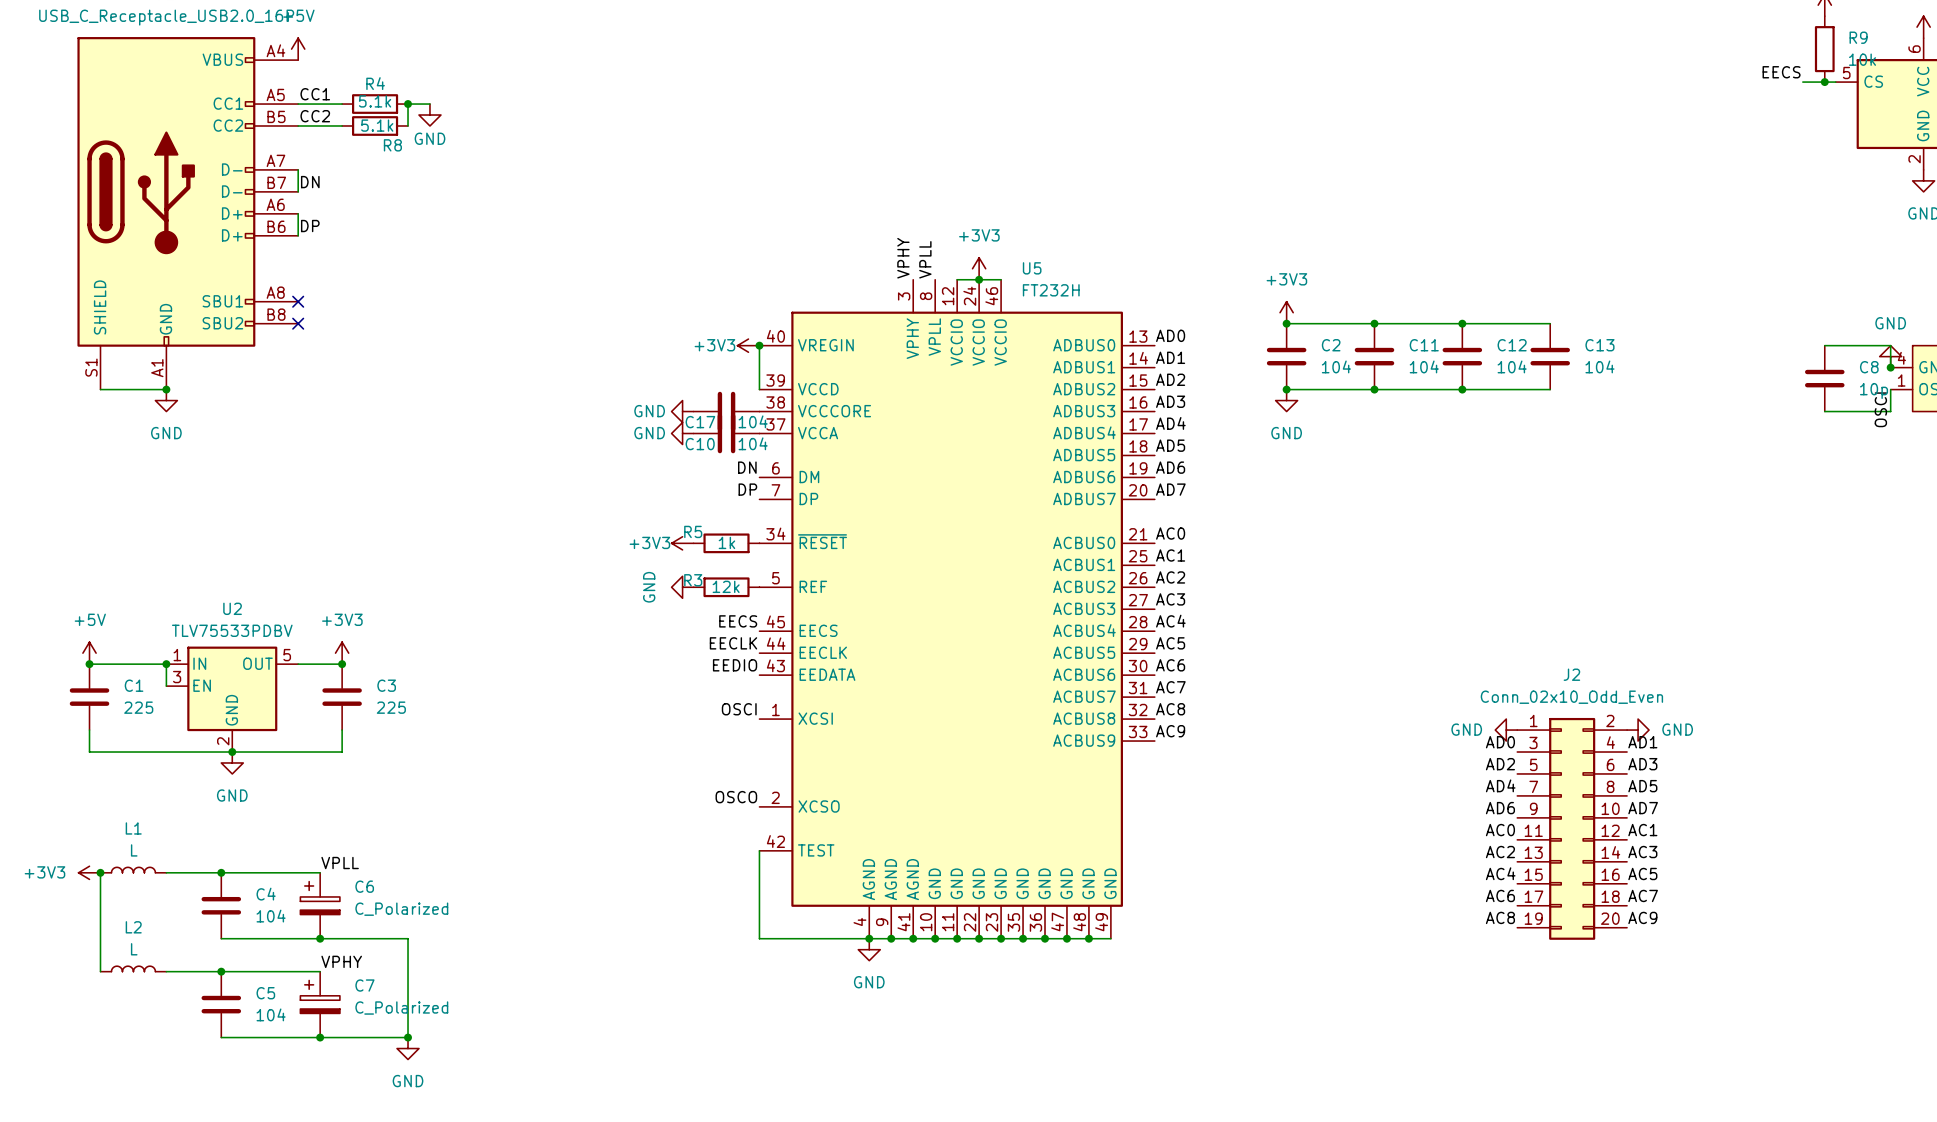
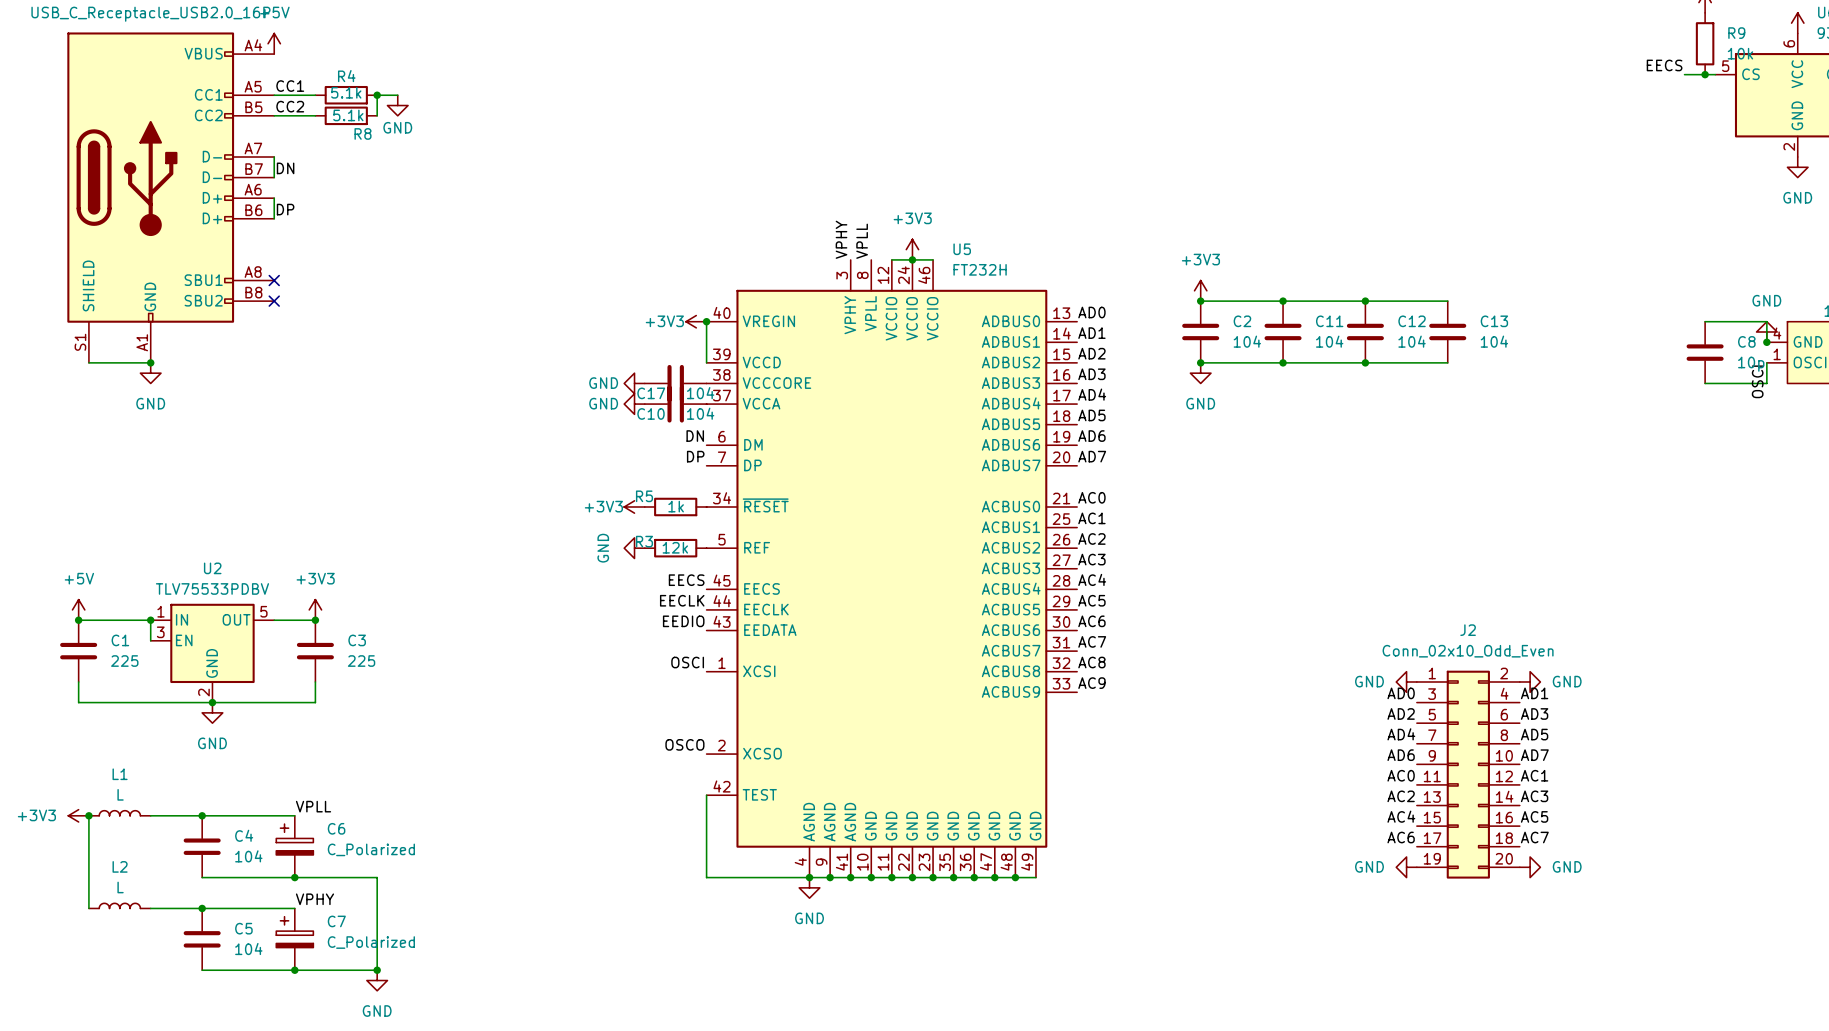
label: AC8 (1500, 917) -> none
label: AC9 (1642, 917) -> none
power symbol: none -> GND (1406, 867)
power symbol: none -> GND (1530, 867)

